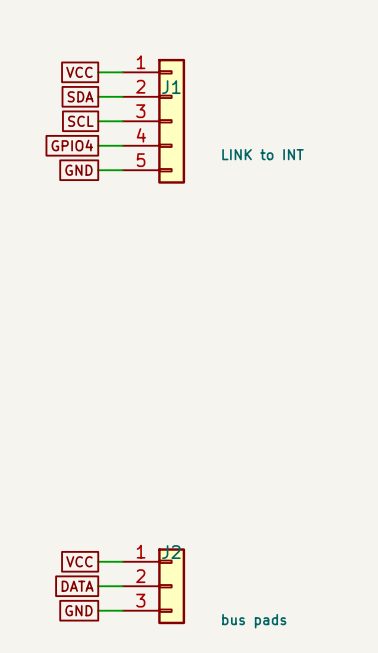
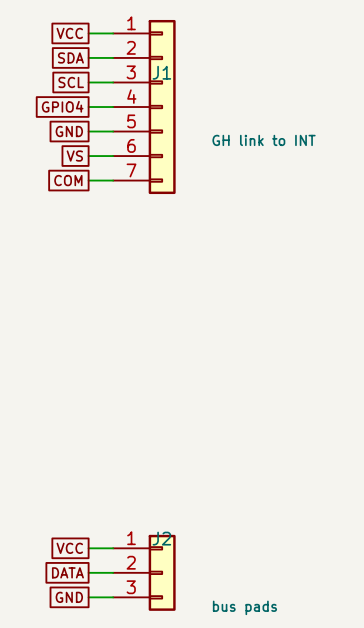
global label: none -> VCC (69, 33)
wire: none -> (88, 33) (113, 33)
J1 symbol: [122, 58, 186, 184] -> [113, 19, 176, 195]
global label: VCC (79, 72) -> SDA (70, 57)
global label: SDA (80, 96) -> SCL (71, 82)
global label: SCL (80, 121) -> GPIO4 (62, 106)
global label: GPIO4 (72, 145) -> GND (69, 131)
J1 value: LINK to INT (262, 154) -> GH link to INT (264, 140)
global label: GND (78, 170) -> VS (74, 156)
global label: none -> COM (68, 180)
wire: none -> (88, 180) (113, 180)

